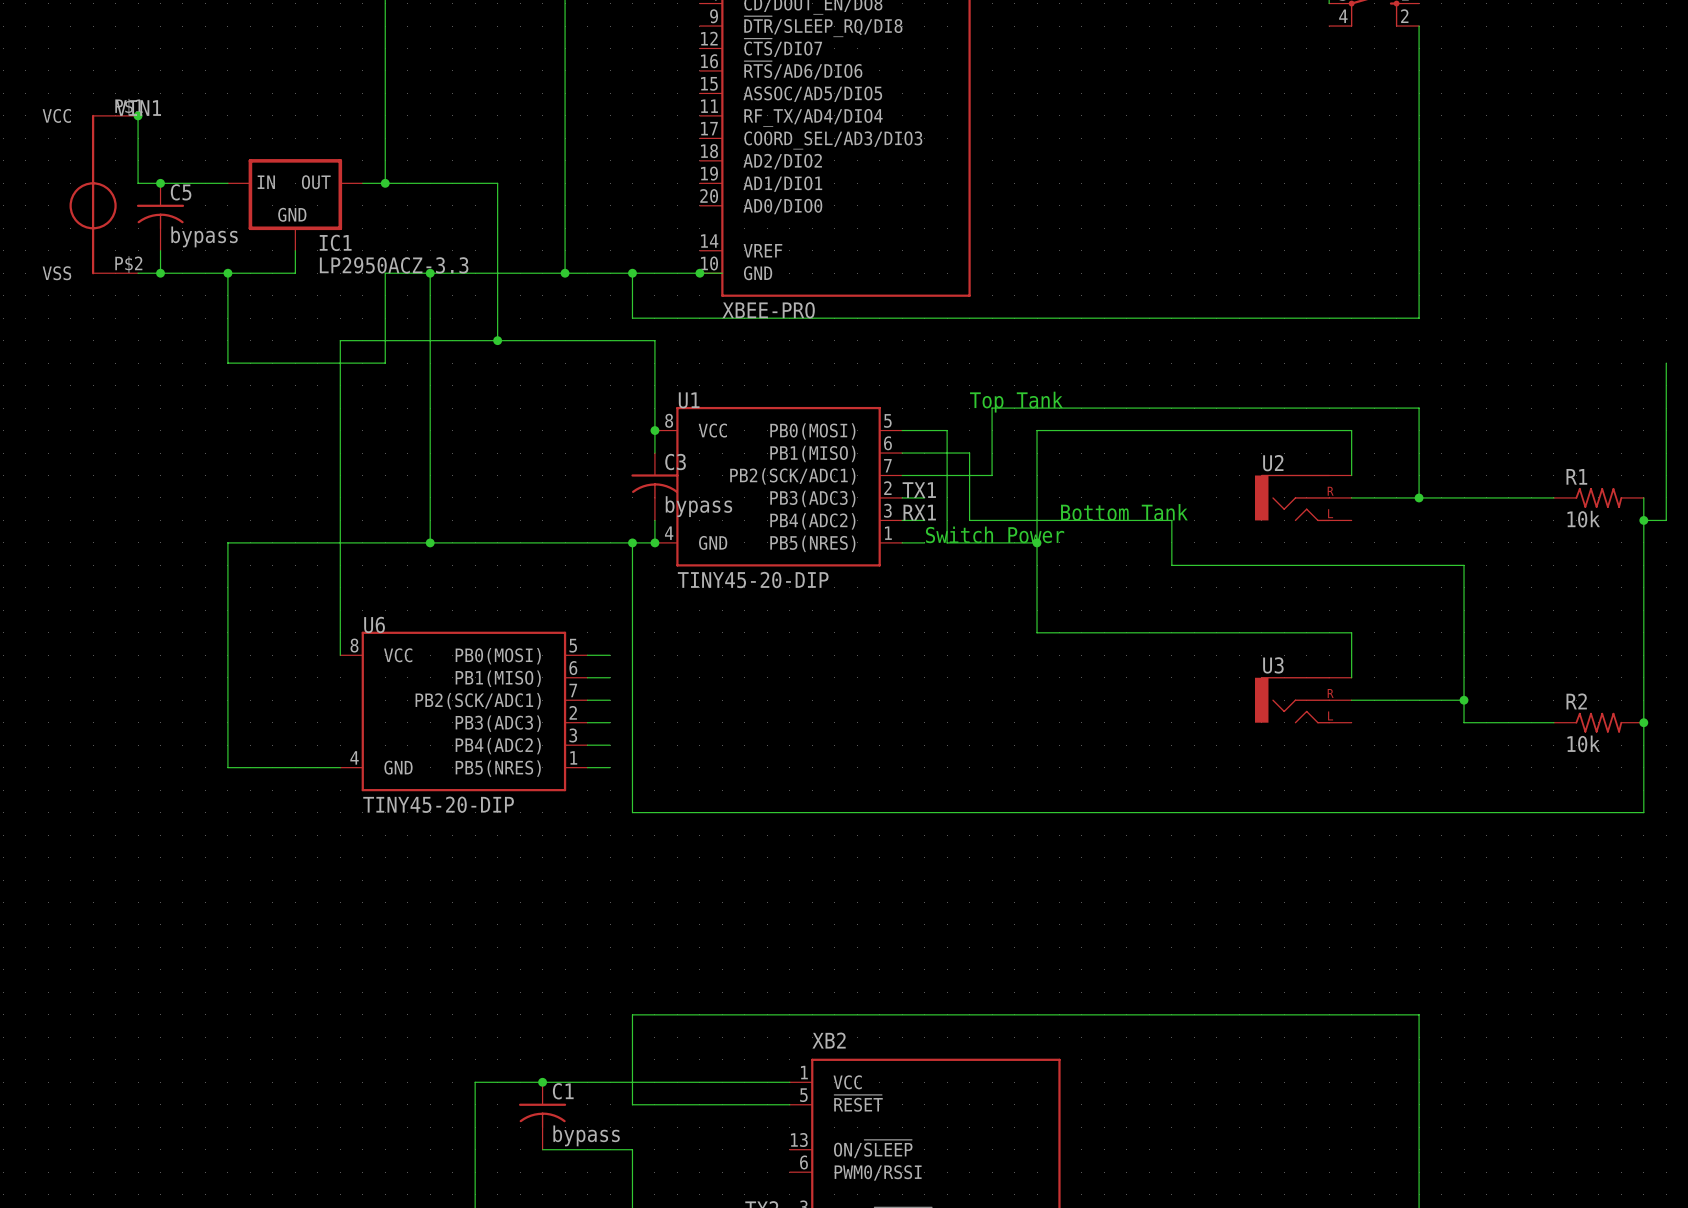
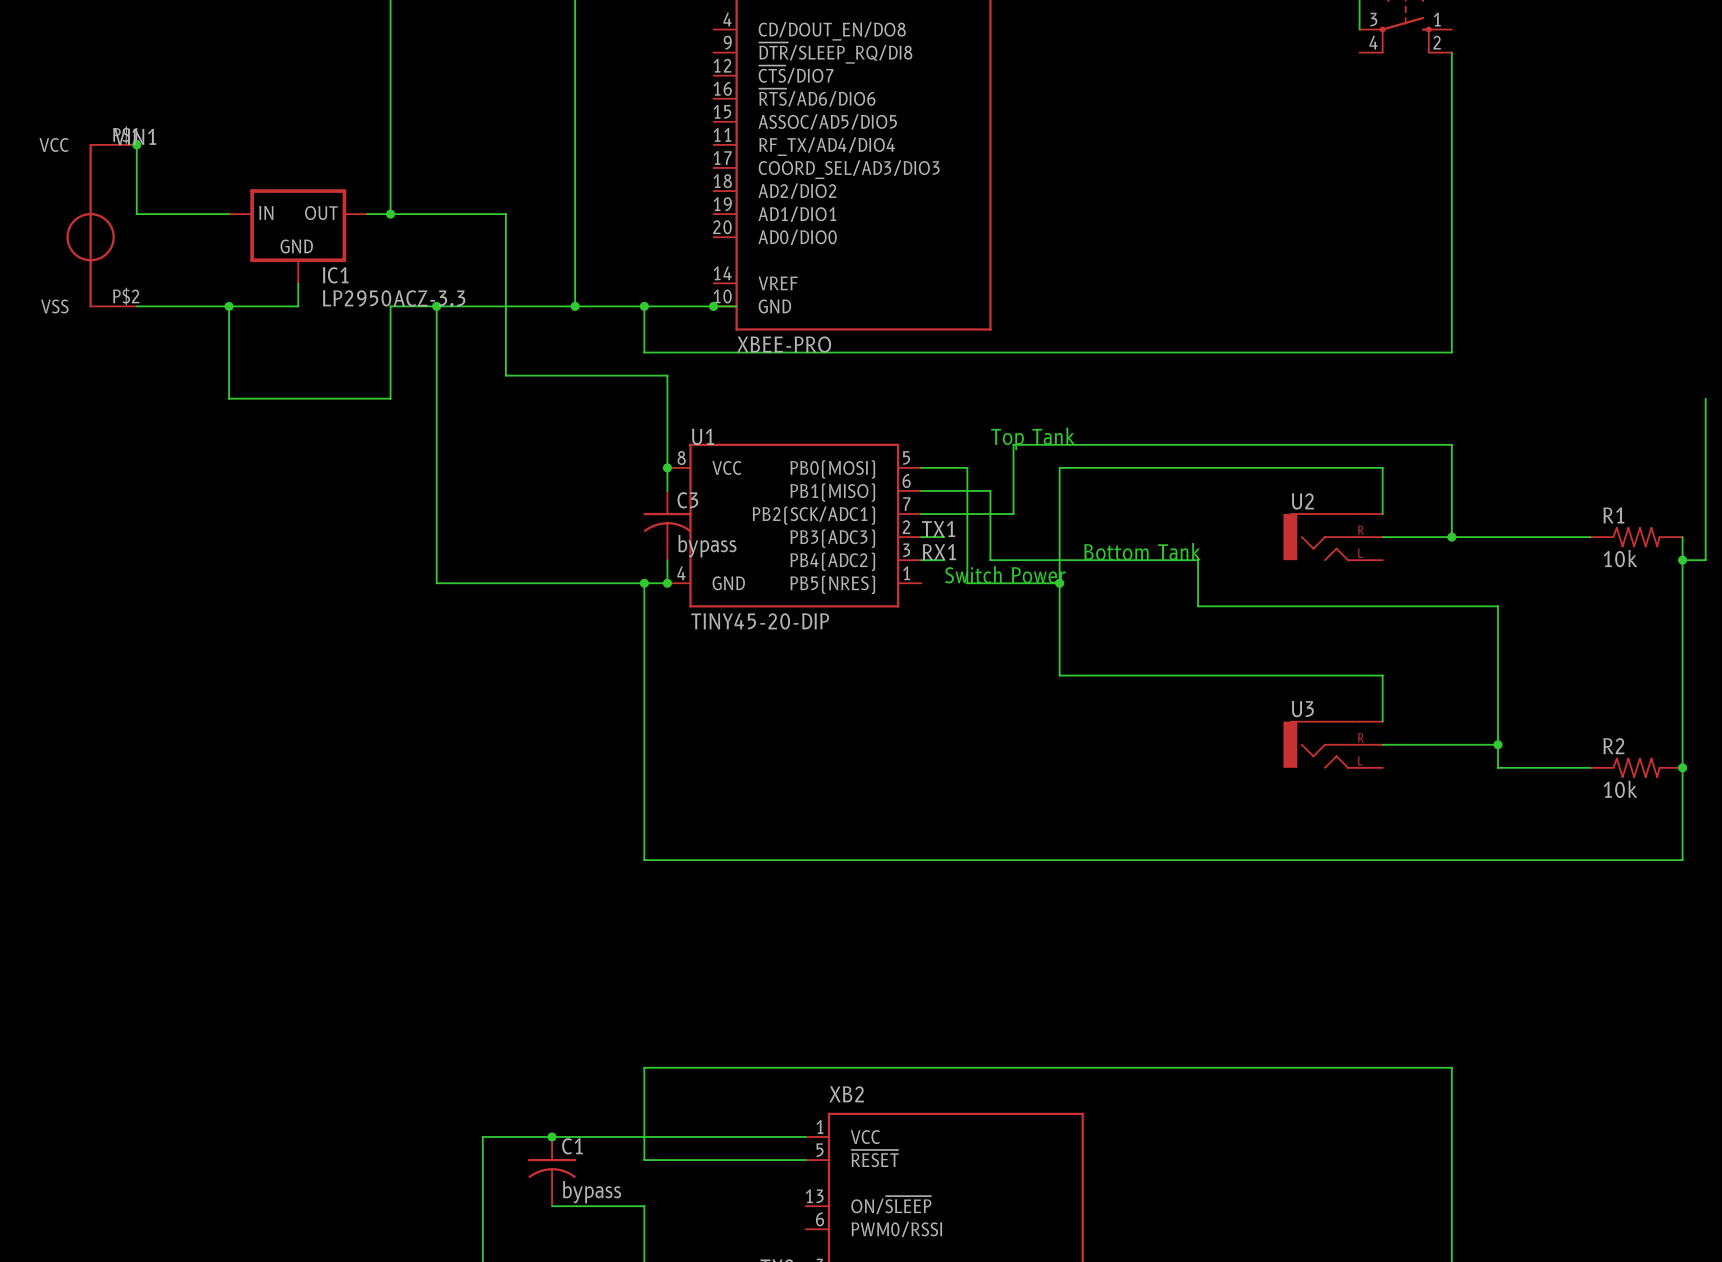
junction: (160, 183) -> none
C5: bypass (160, 217) -> none
wire: (160, 250) (160, 273) -> none
junction: (160, 273) -> none
wire: (497, 340) (340, 340) (340, 655) -> none
junction: (497, 340) -> none
wire: (430, 542) (227, 542) (227, 767) (340, 767) -> none
junction: (430, 542) -> none
wire: (902, 542) (924, 542) -> none
wire: (587, 655) (610, 655) -> none
wire: (587, 677) (610, 677) -> none
wire: (587, 700) (610, 700) -> none
U6: TINY45-20-DIP (463, 711) -> none
wire: (587, 722) (610, 722) -> none
wire: (587, 745) (610, 745) -> none
wire: (587, 767) (610, 767) -> none

